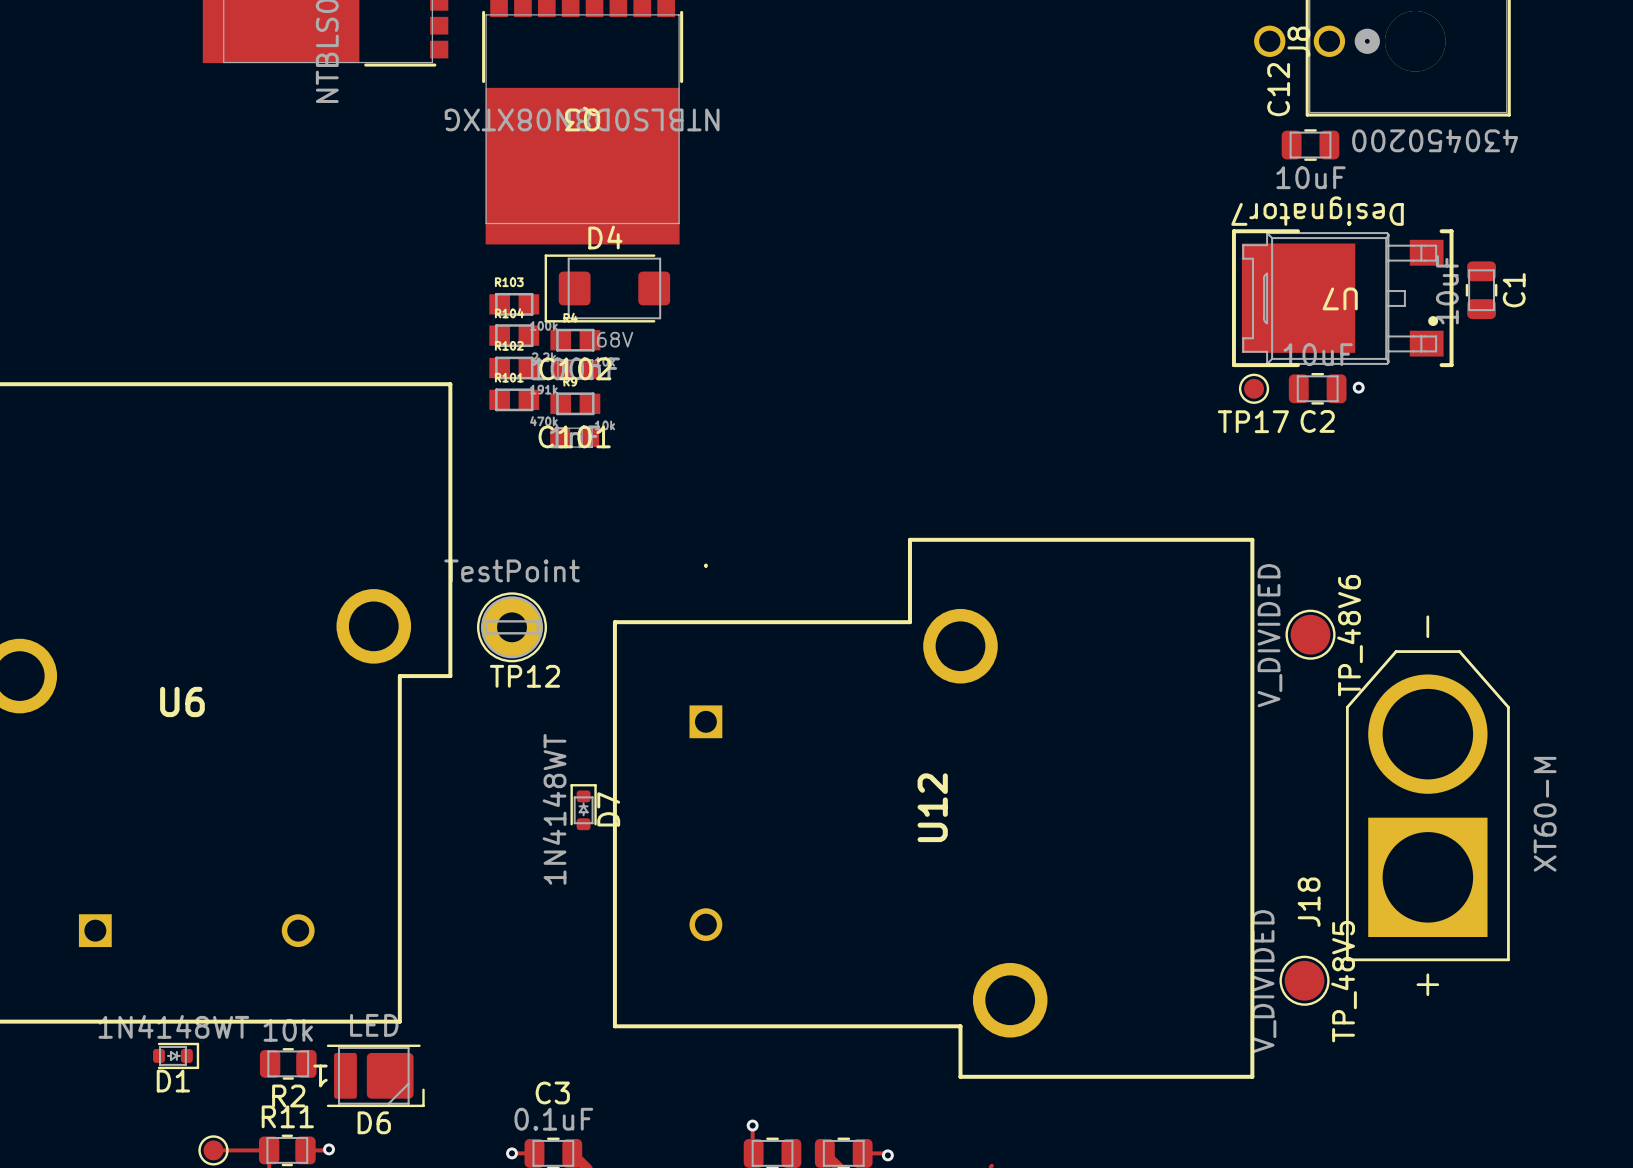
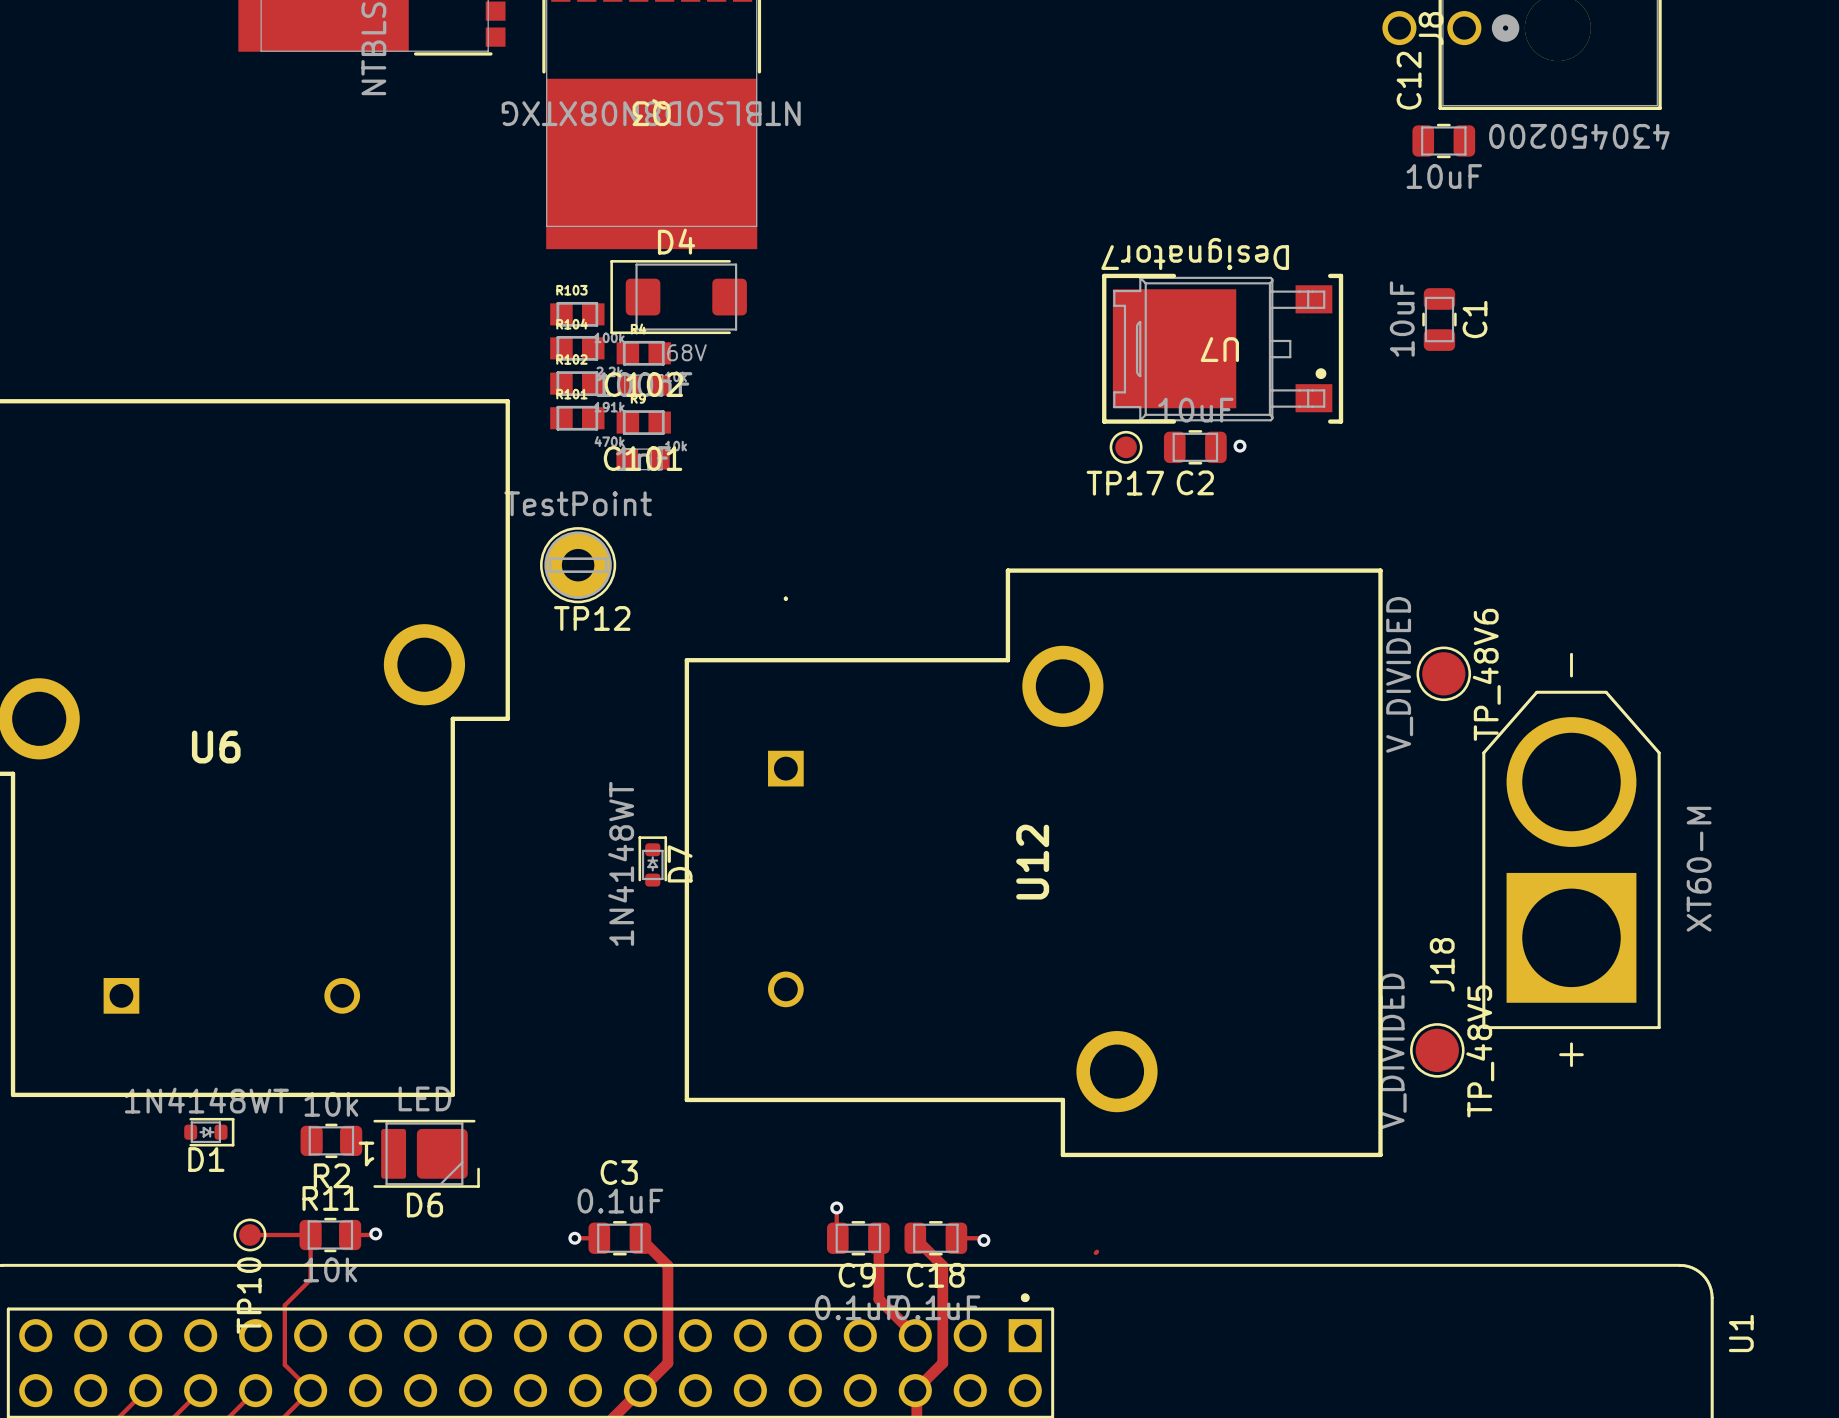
C1 position: (1481, 290) -> (1439, 319)
U7 position: (1342, 298) -> (1222, 348)
via: (1358, 387) -> none
TP17 position: (1254, 388) -> (1126, 447)
C2 position: (1317, 388) -> (1195, 447)
via: none -> (1240, 446)
TP12 position: (512, 627) -> (578, 565)

